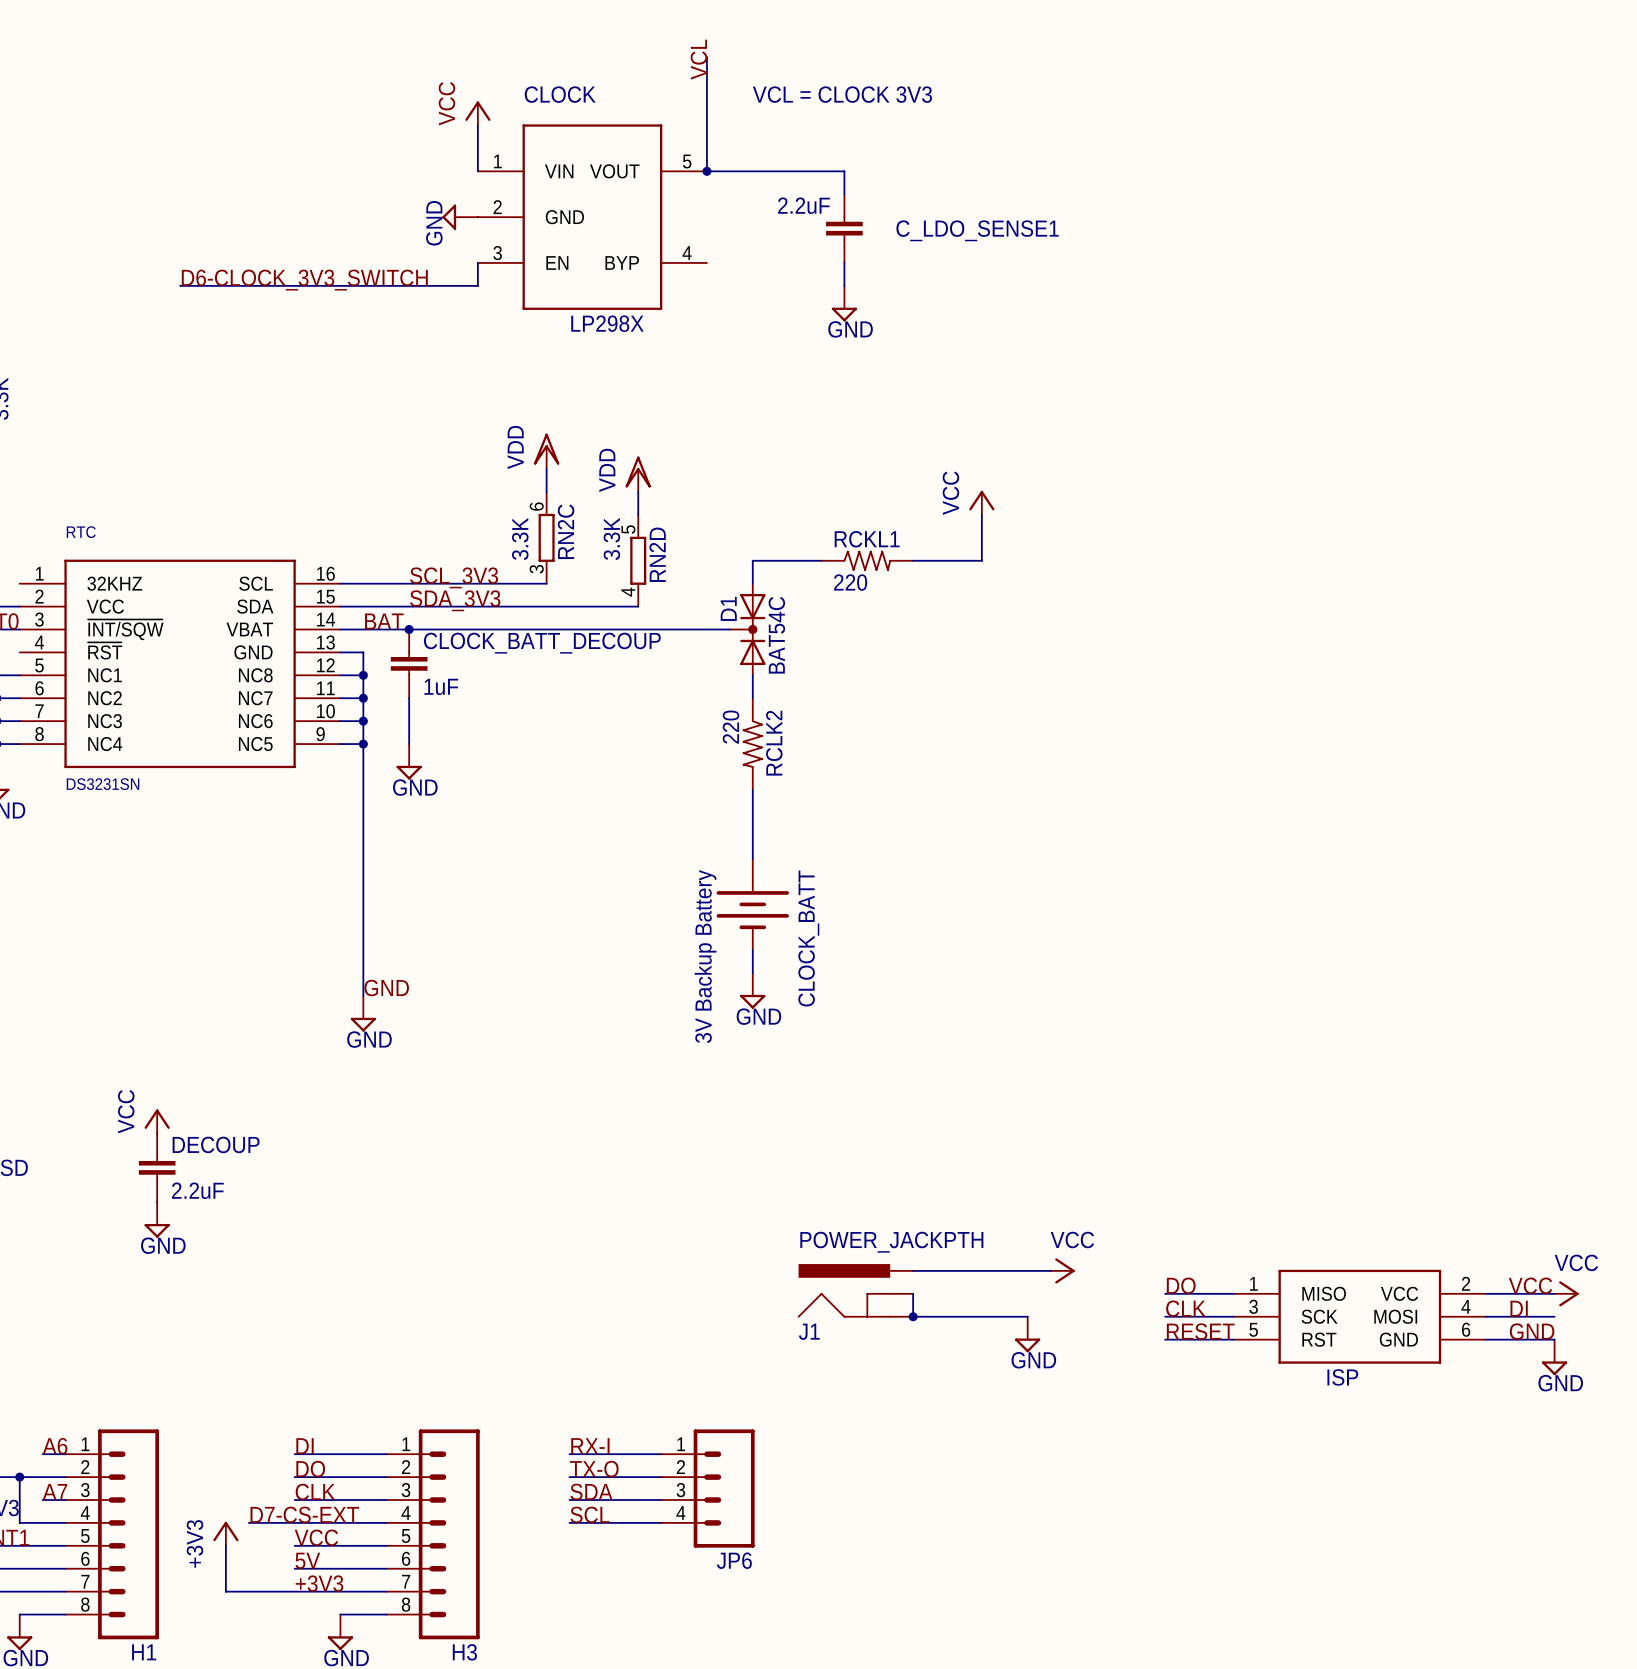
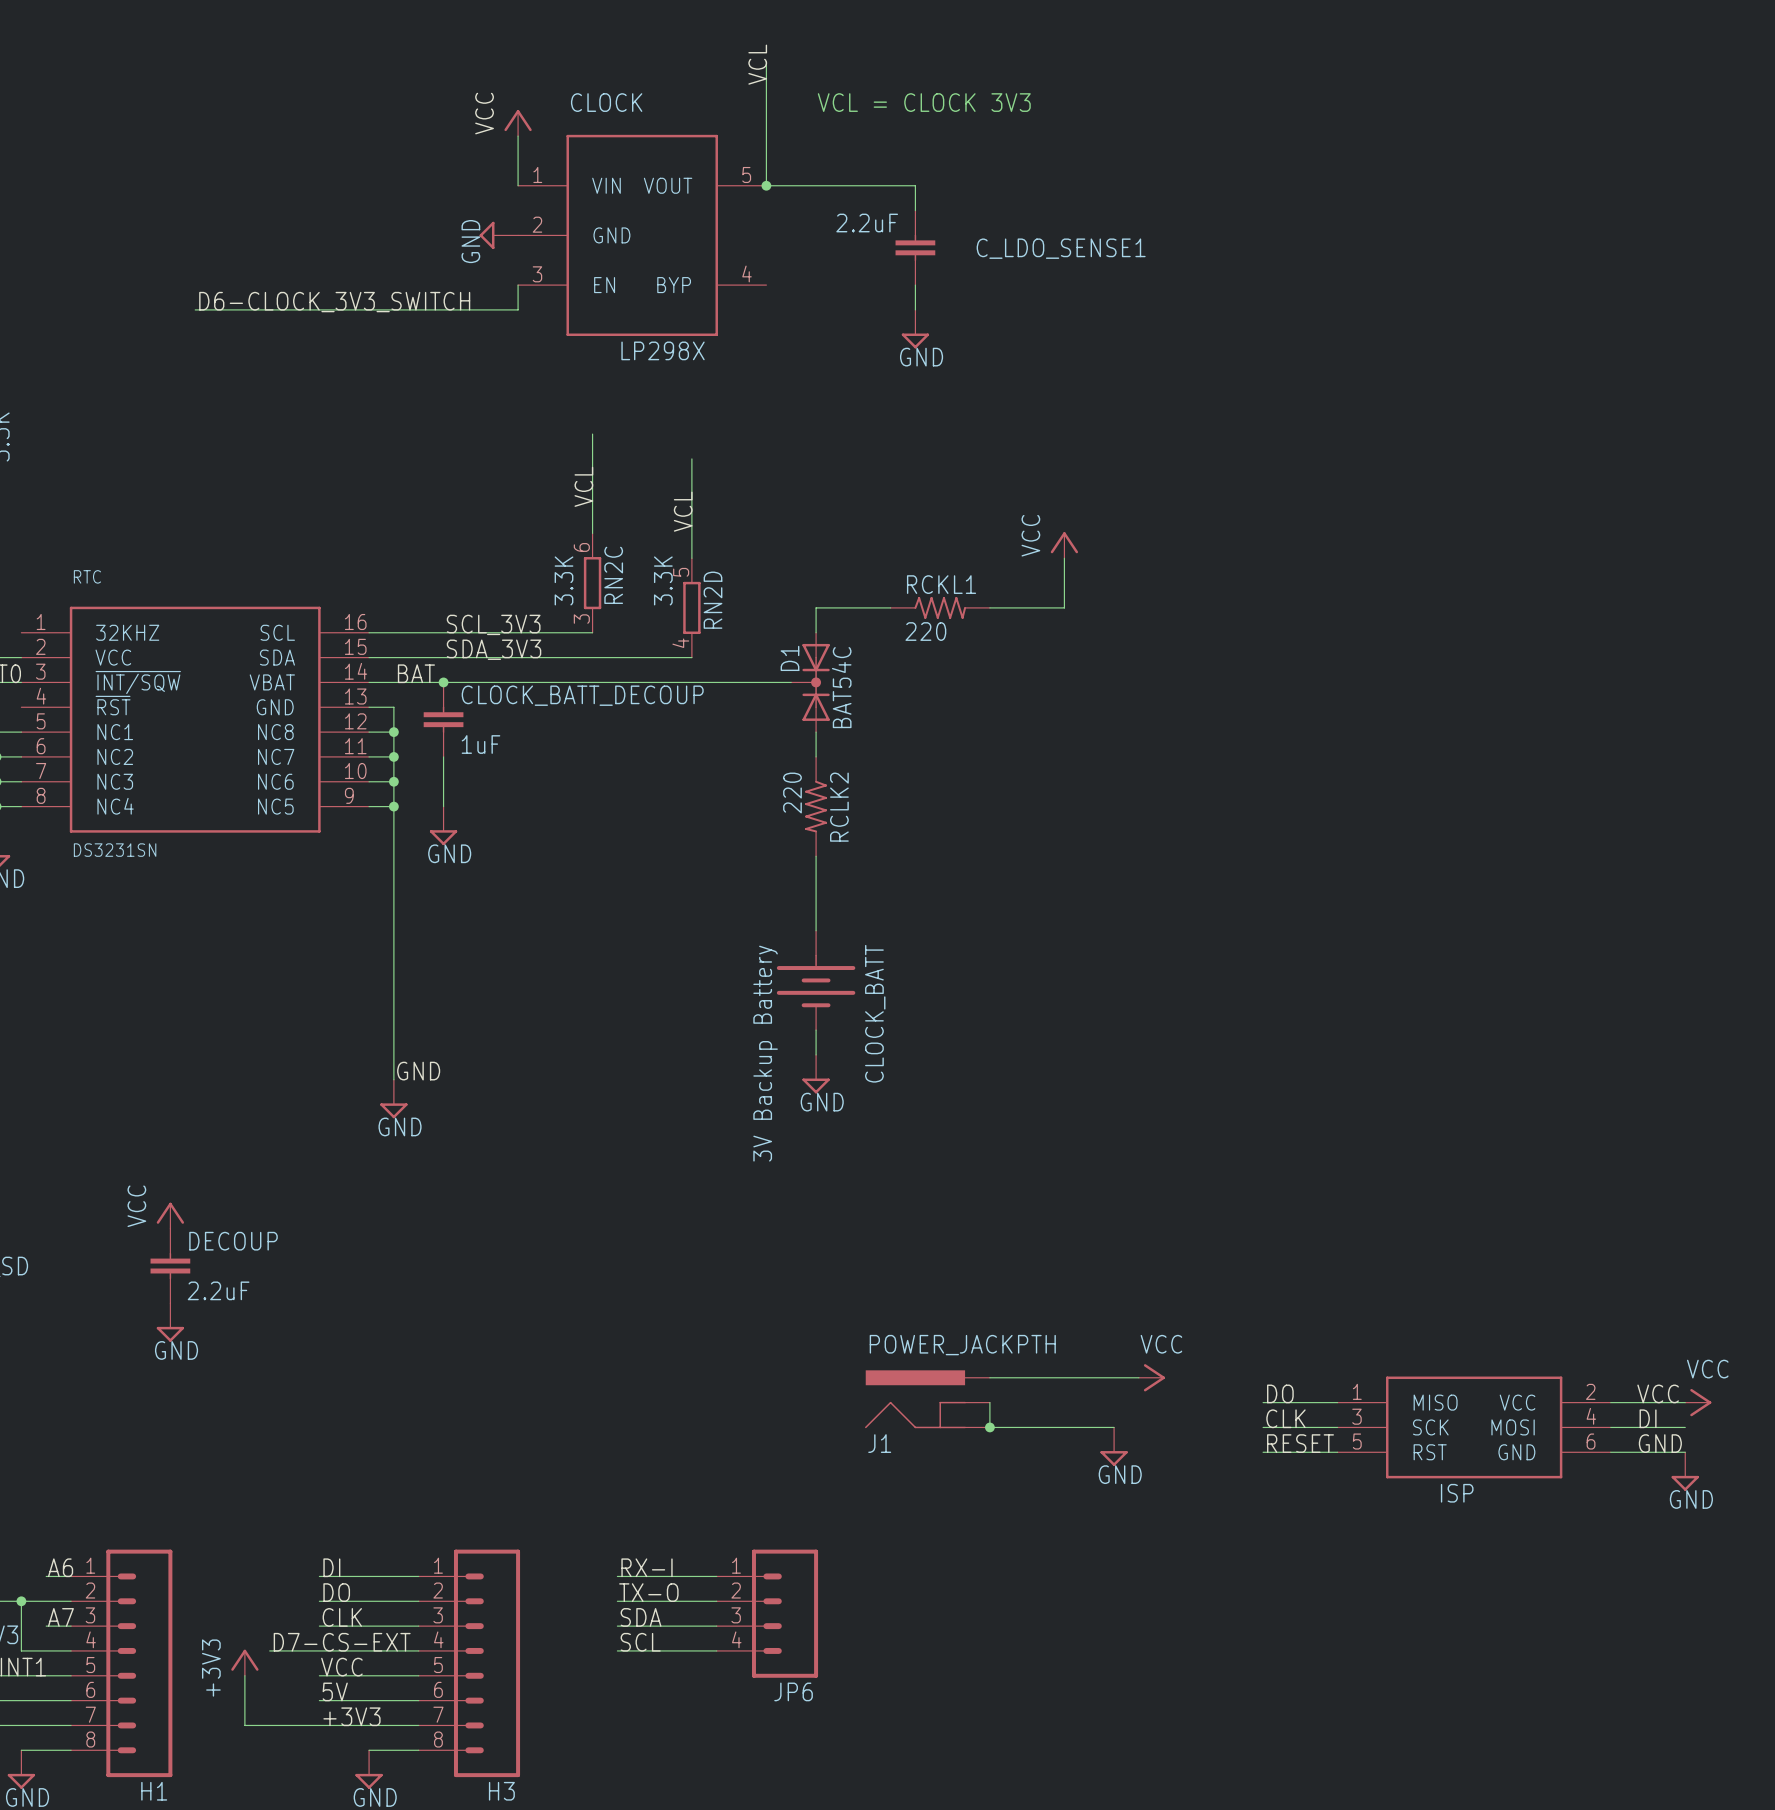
wire: none -> (592, 434) (592, 508)
wire: none -> (691, 458) (691, 533)
label: none -> VCL (583, 486)
power symbol: VDD (546, 451) -> none
label: none -> VCL (683, 511)
power symbol: VDD (638, 474) -> none

